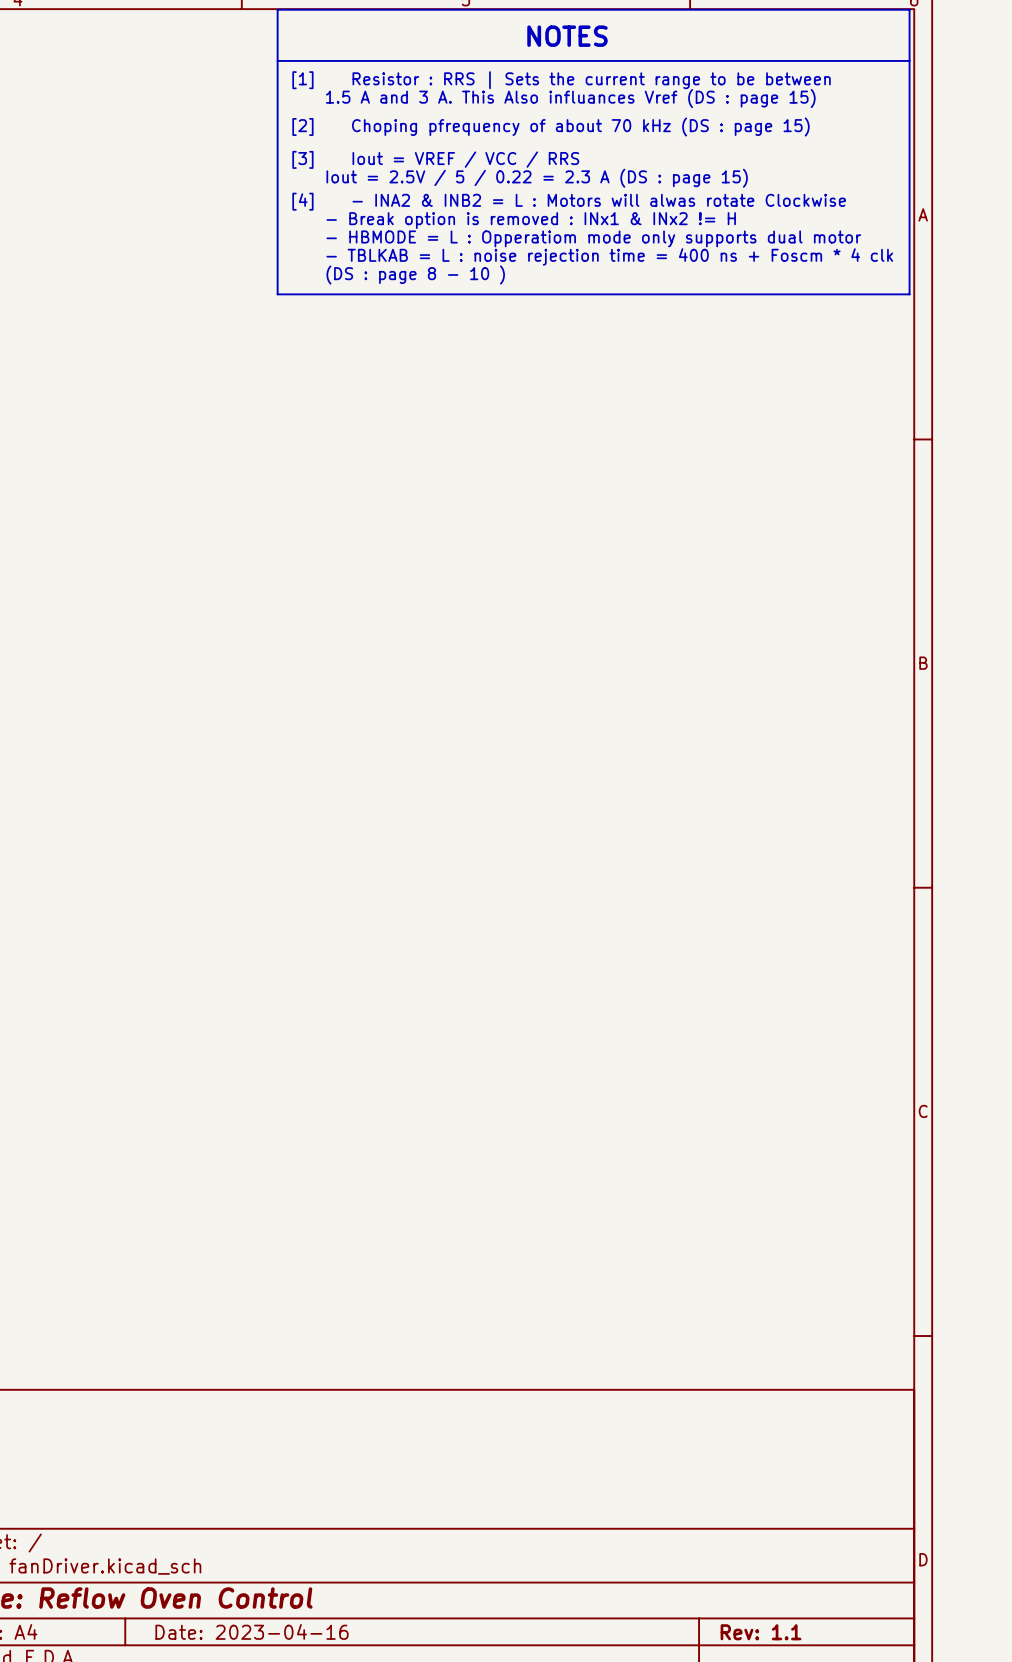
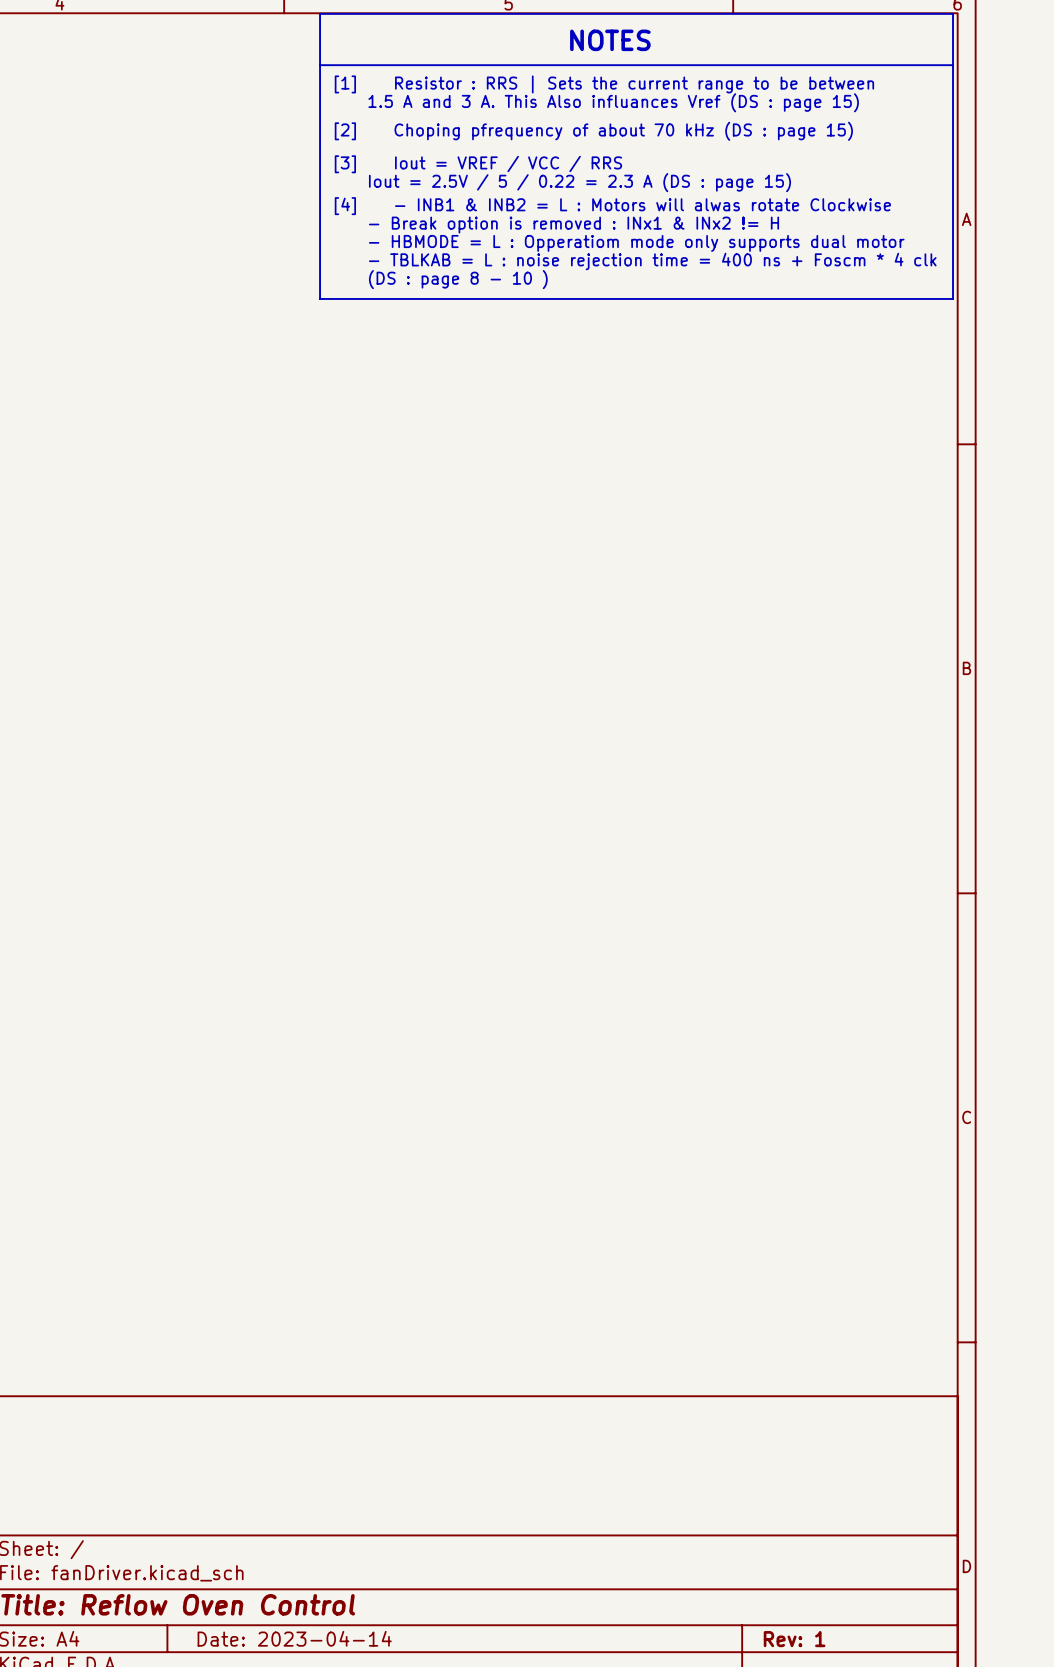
text: [4] - INA2 & INB2 = L : Motors will alwas rotate Clockwise (569, 201) -> [4] - INB1 & INB2 = L : Motors will alwas rotate Clockwise (612, 206)
title block: Date: 2023-04-16 (252, 1631) -> Date: 2023-04-14 (294, 1638)
title block: Rev: 1.1 (761, 1632) -> Rev: 1 (794, 1639)

